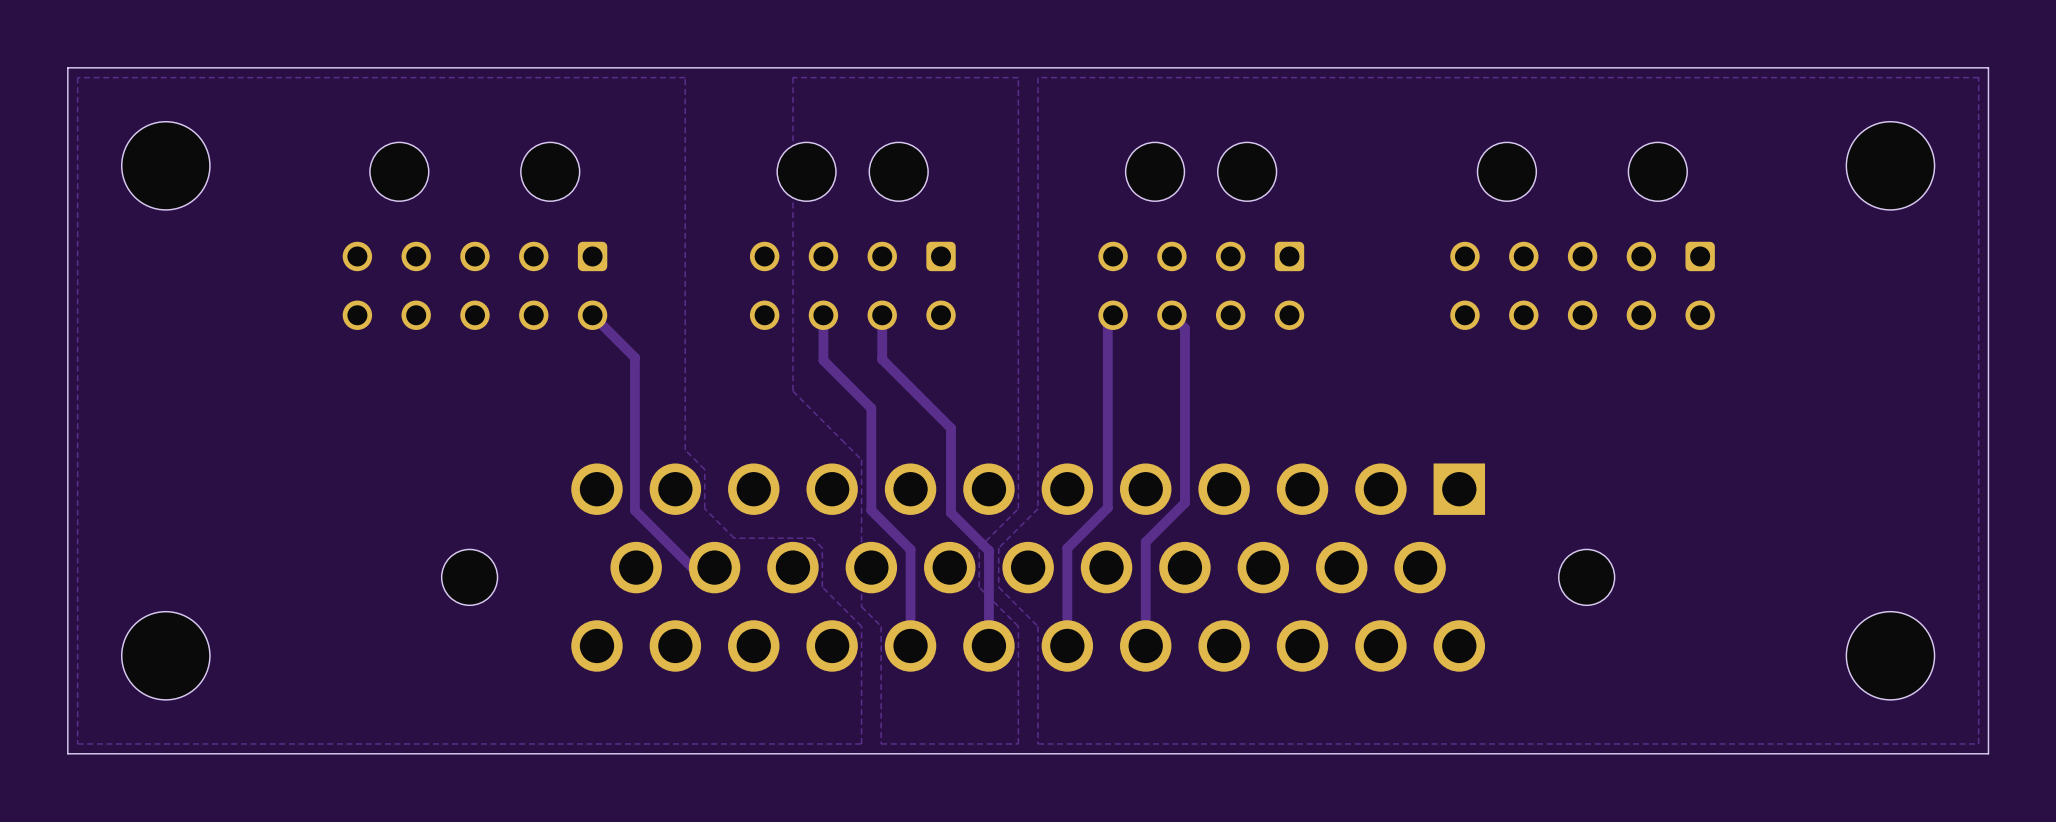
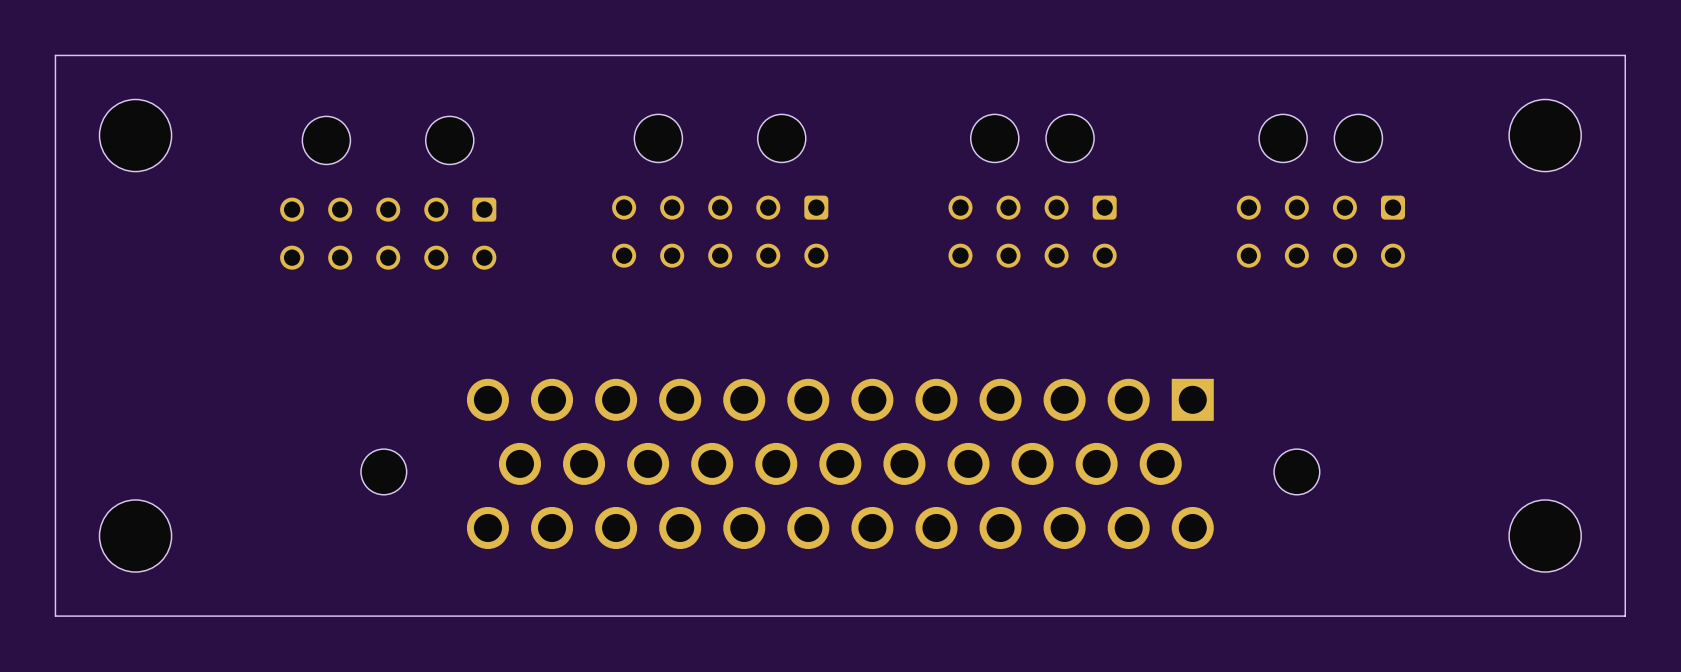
zone outline: (685, 77) (77, 77) (77, 743) (861, 743) (861, 626) (822, 587) (822, 547) (812, 538) (734, 538) (704, 508) (704, 469) (685, 450) (685, 77) -> none
zone outline: (1018, 77) (792, 77) (792, 391) (861, 459) (861, 606) (881, 626) (881, 743) (1018, 743) (1018, 626) (979, 587) (979, 547) (1018, 508) (1018, 77) -> none
zone outline: (1978, 77) (1978, 743) (1037, 743) (1037, 626) (998, 587) (998, 547) (1037, 508) (1037, 77) (1978, 77) -> none
part: none -> (720, 191)
part: none -> (1320, 191)
part: (852, 236) -> none
part position: (1201, 236) -> (1032, 191)
part: (1582, 236) -> none
track: (592, 315) (634, 357) (634, 510) (692, 567) (714, 567) -> none
track: (823, 315) (823, 360) (871, 408) (871, 510) (910, 549) (910, 645) -> none
track: (882, 315) (882, 359) (950, 428) (950, 512) (988, 550) (988, 645) -> none
track: (1113, 315) (1107, 320) (1107, 507) (1067, 548) (1067, 645) -> none
track: (1171, 315) (1184, 328) (1184, 502) (1145, 542) (1145, 645) -> none

